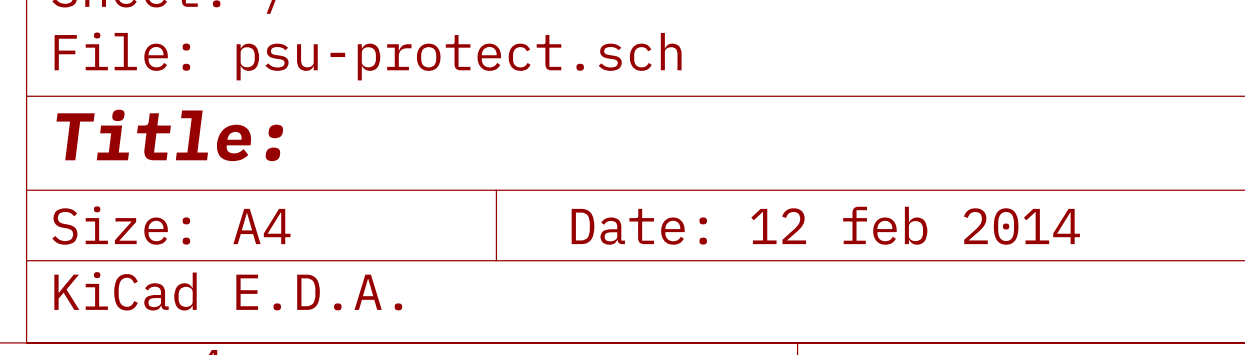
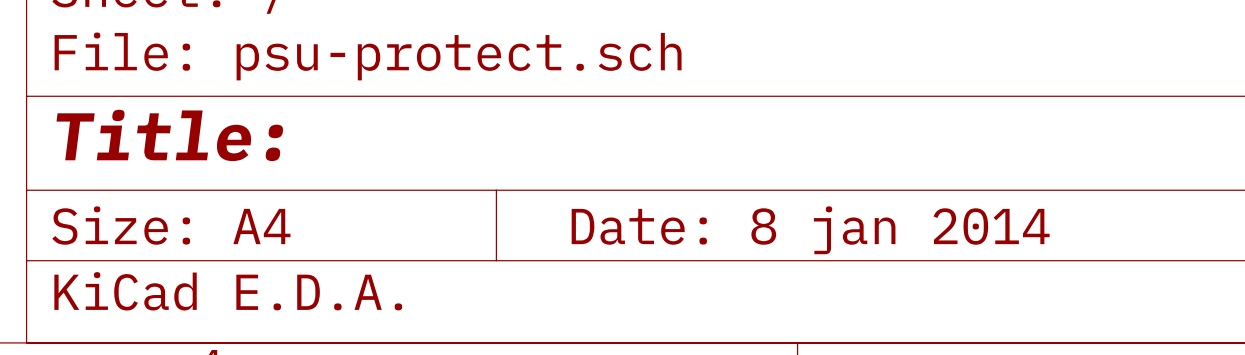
title block: Date: 12 feb 2014 (825, 225) -> Date: 8 jan 2014 (810, 230)

